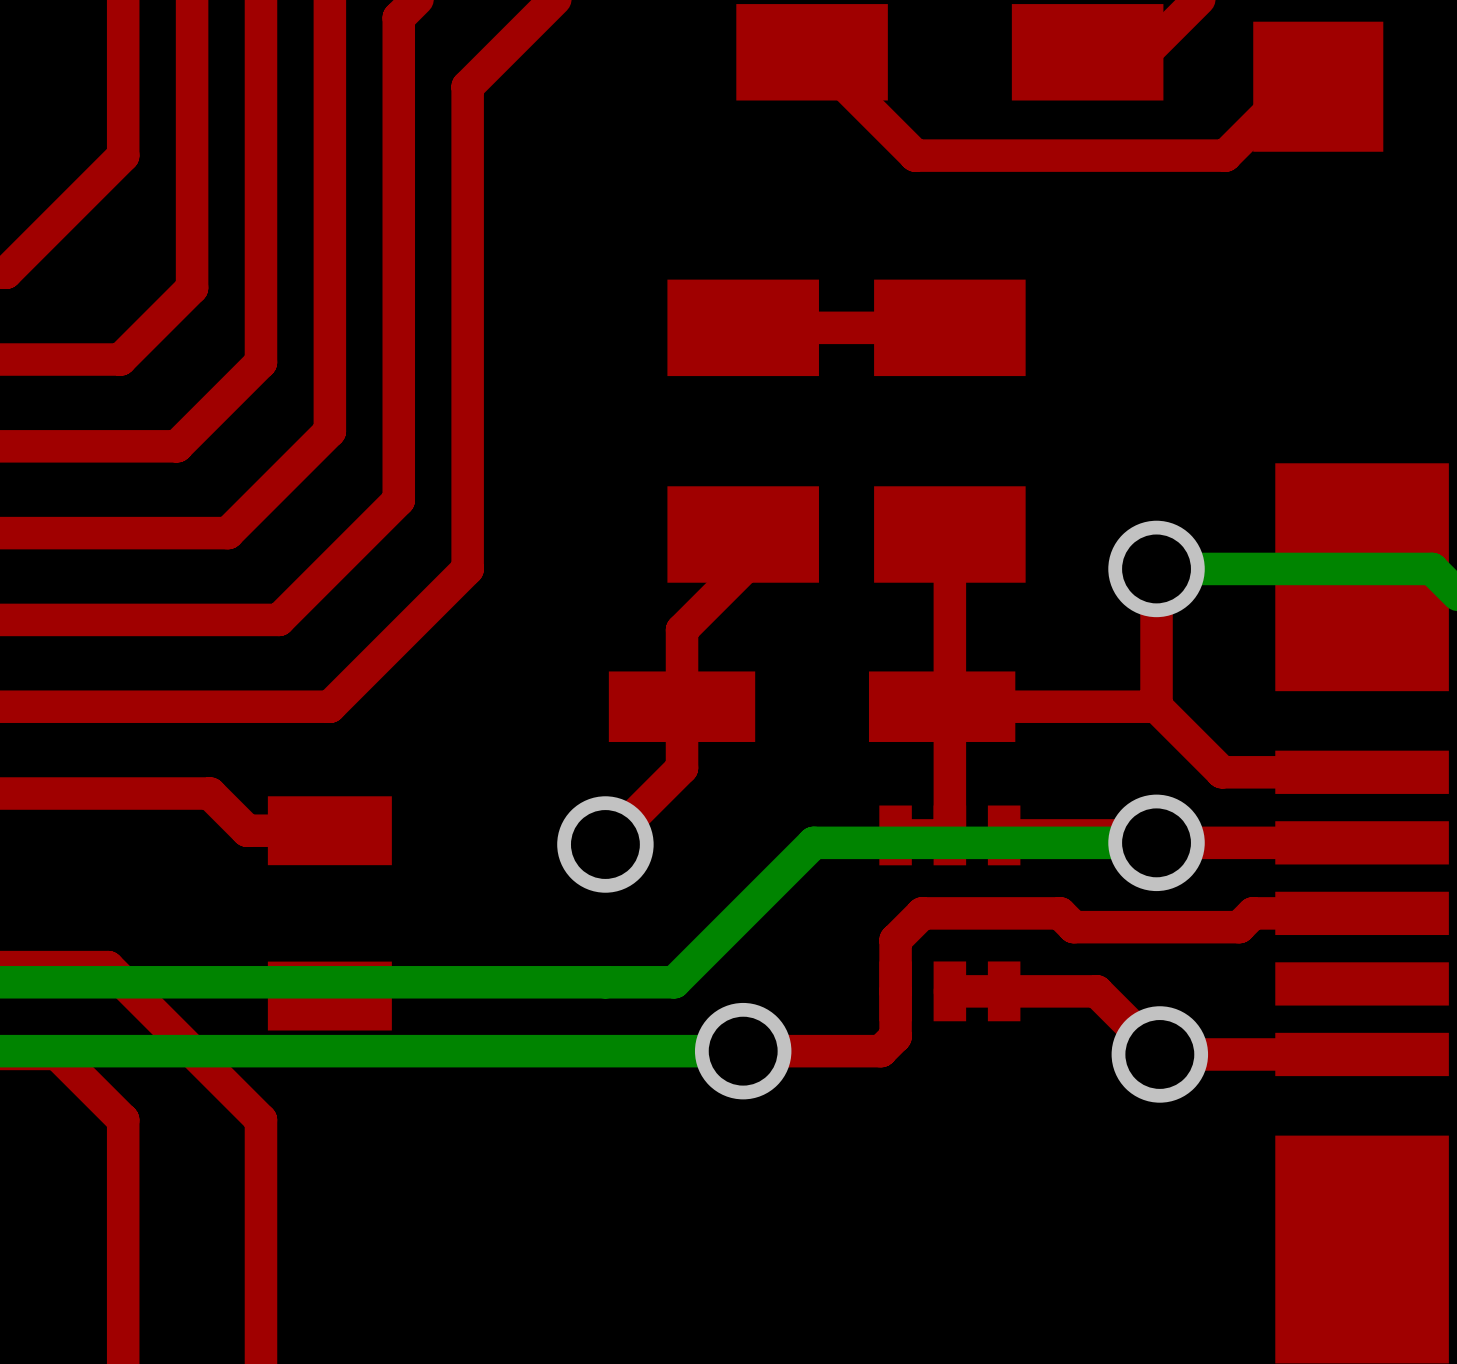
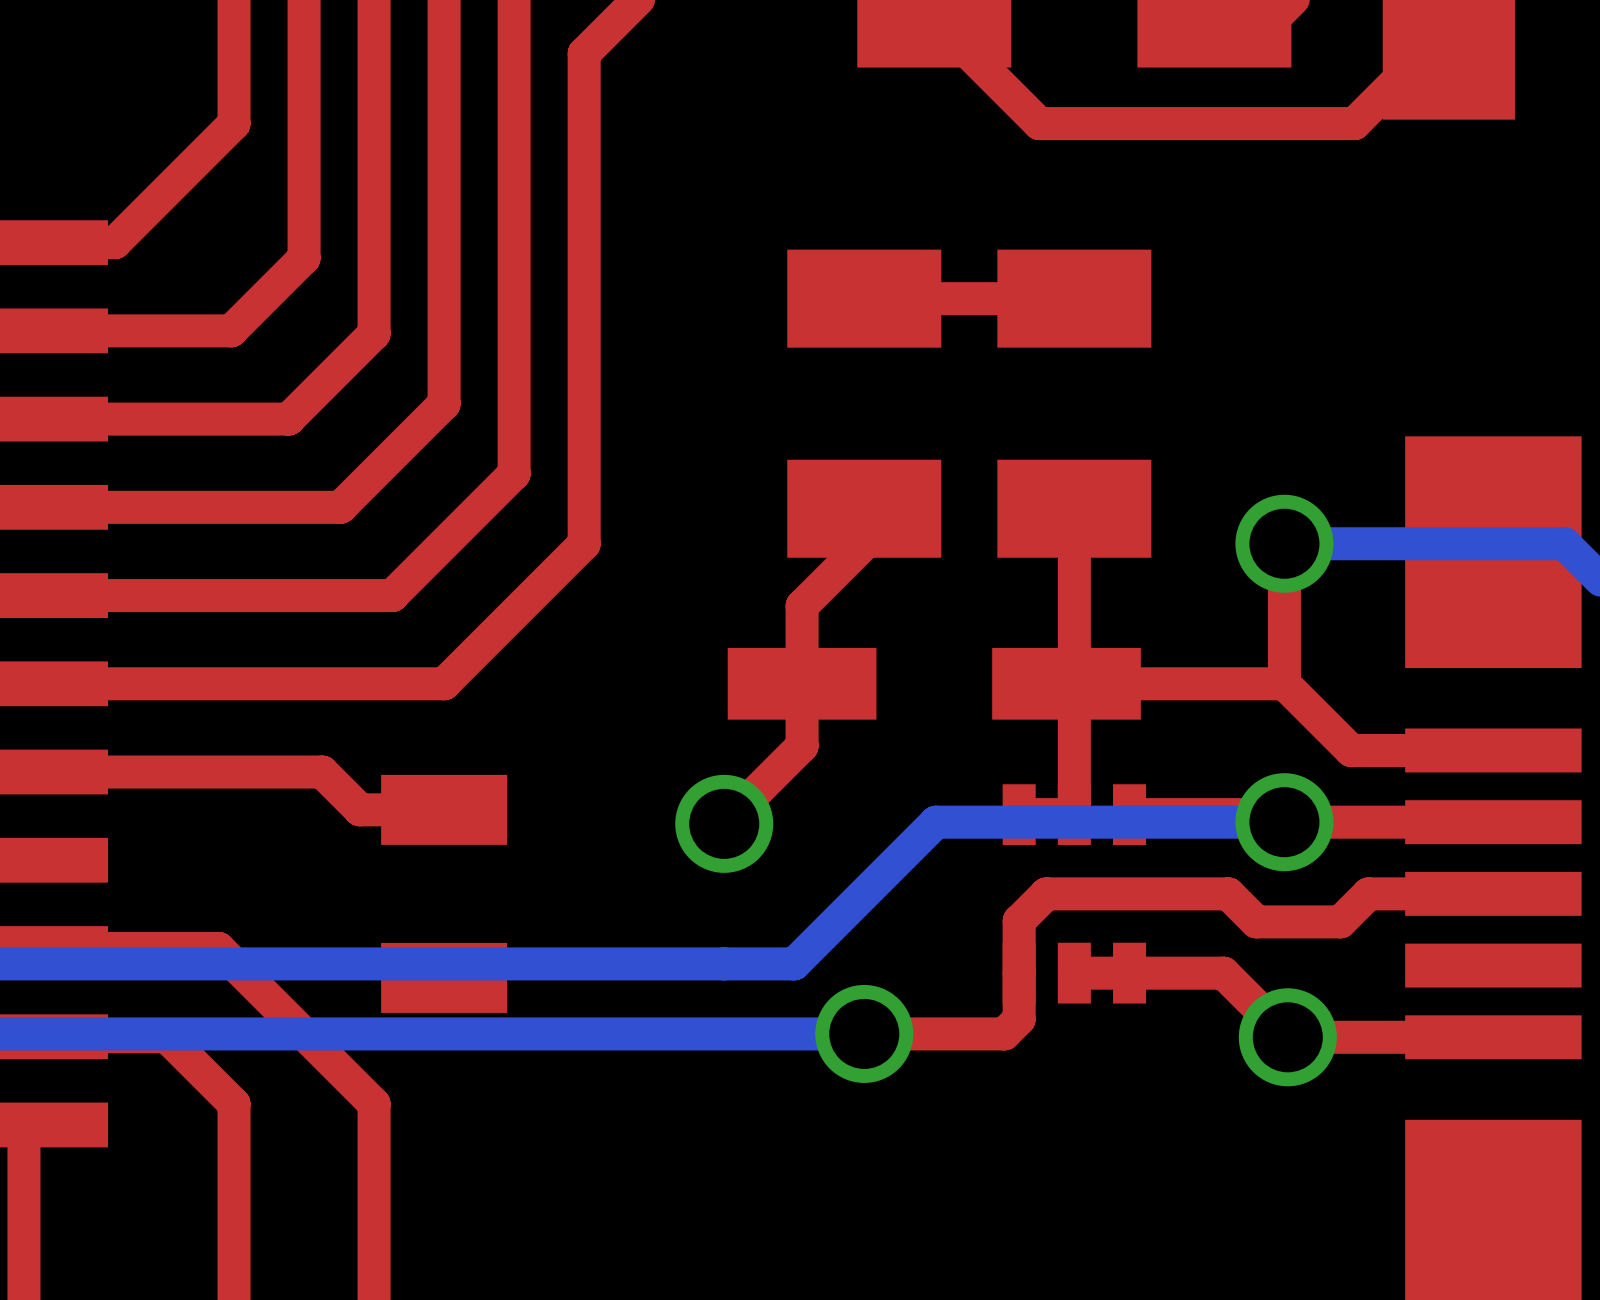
top track: (1252, 913) (1239, 927) (1073, 927) (1060, 913) -> (1382, 893) (1368, 893) (1340, 921) (1256, 921) (1228, 893) (1186, 893)

